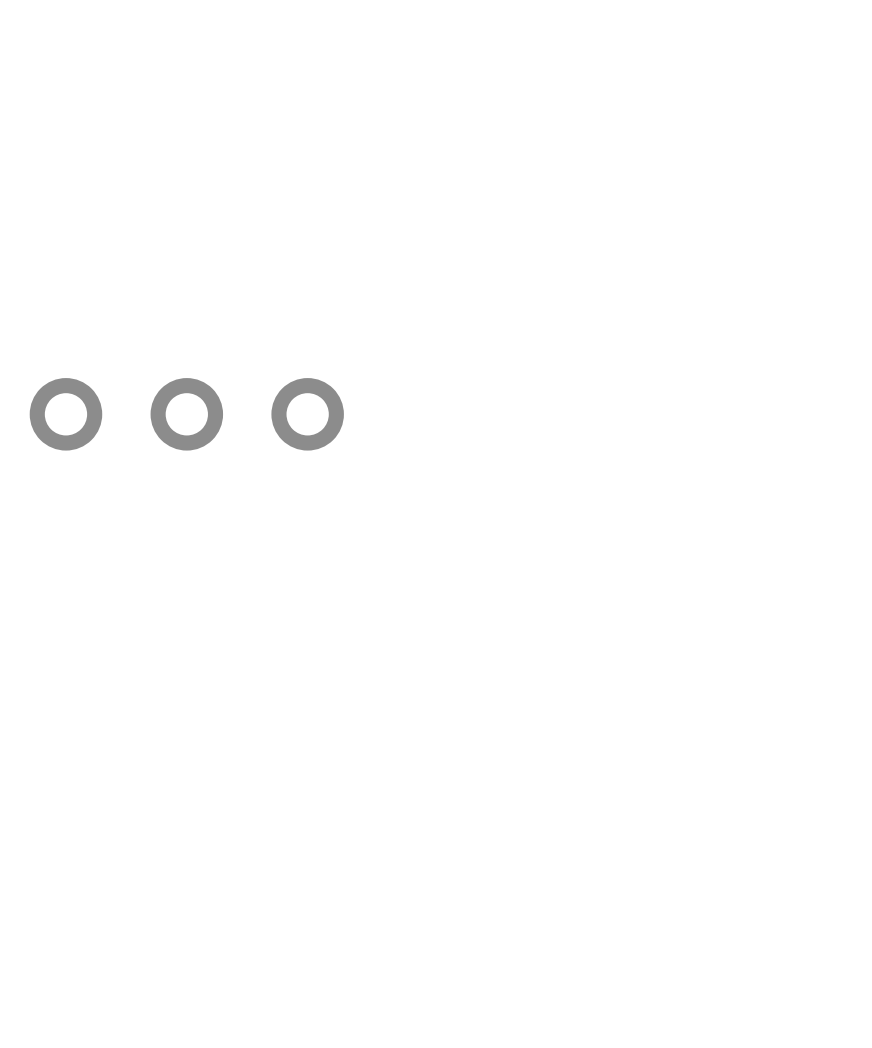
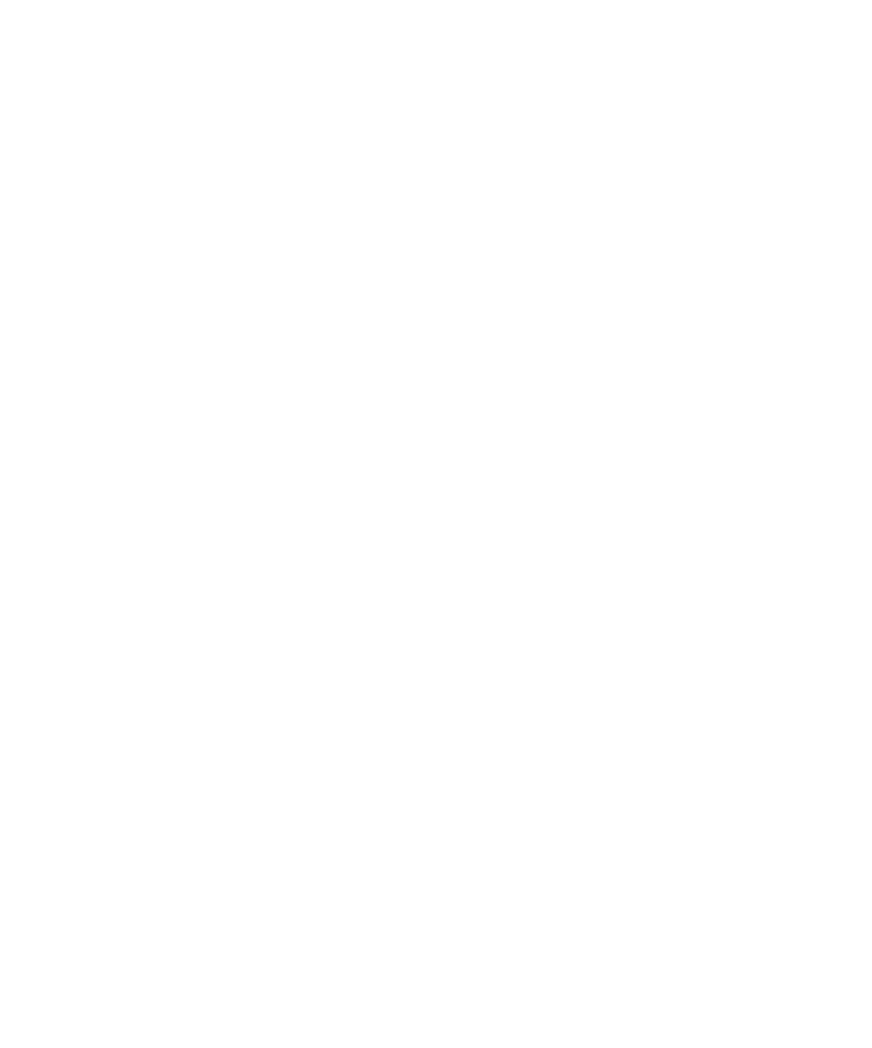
part: (186, 414) -> none

